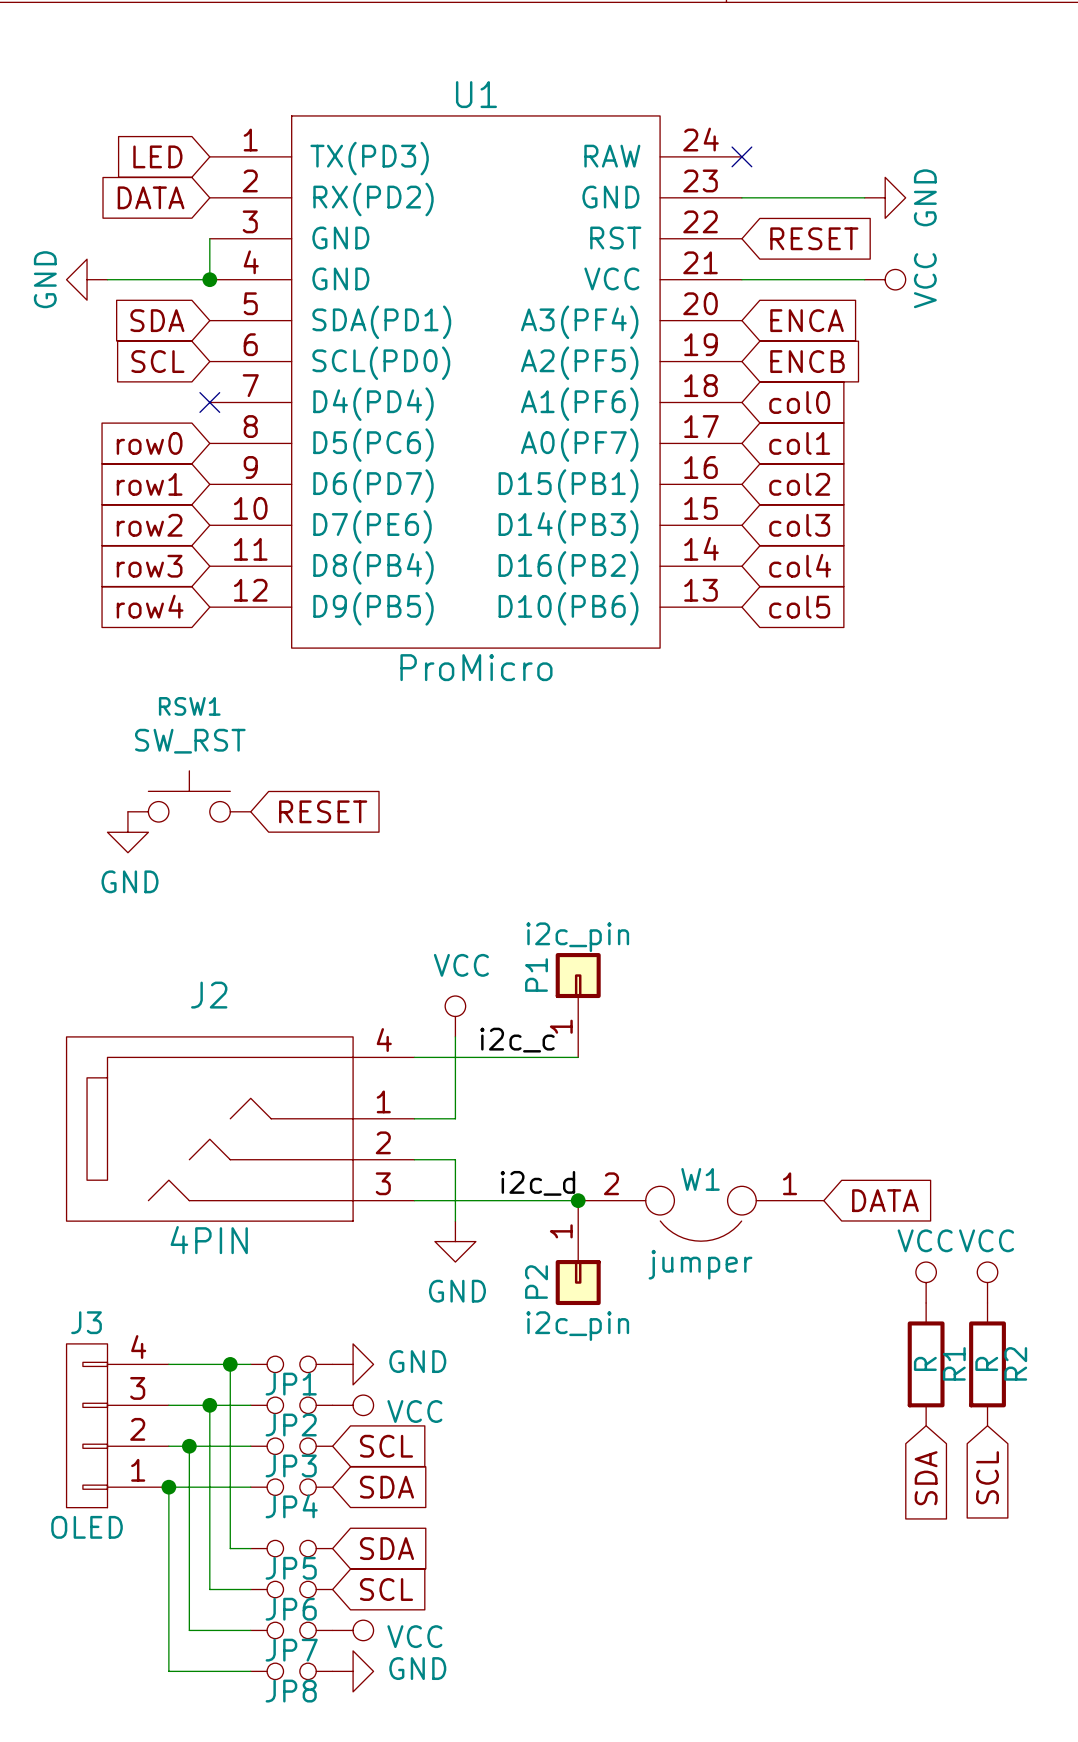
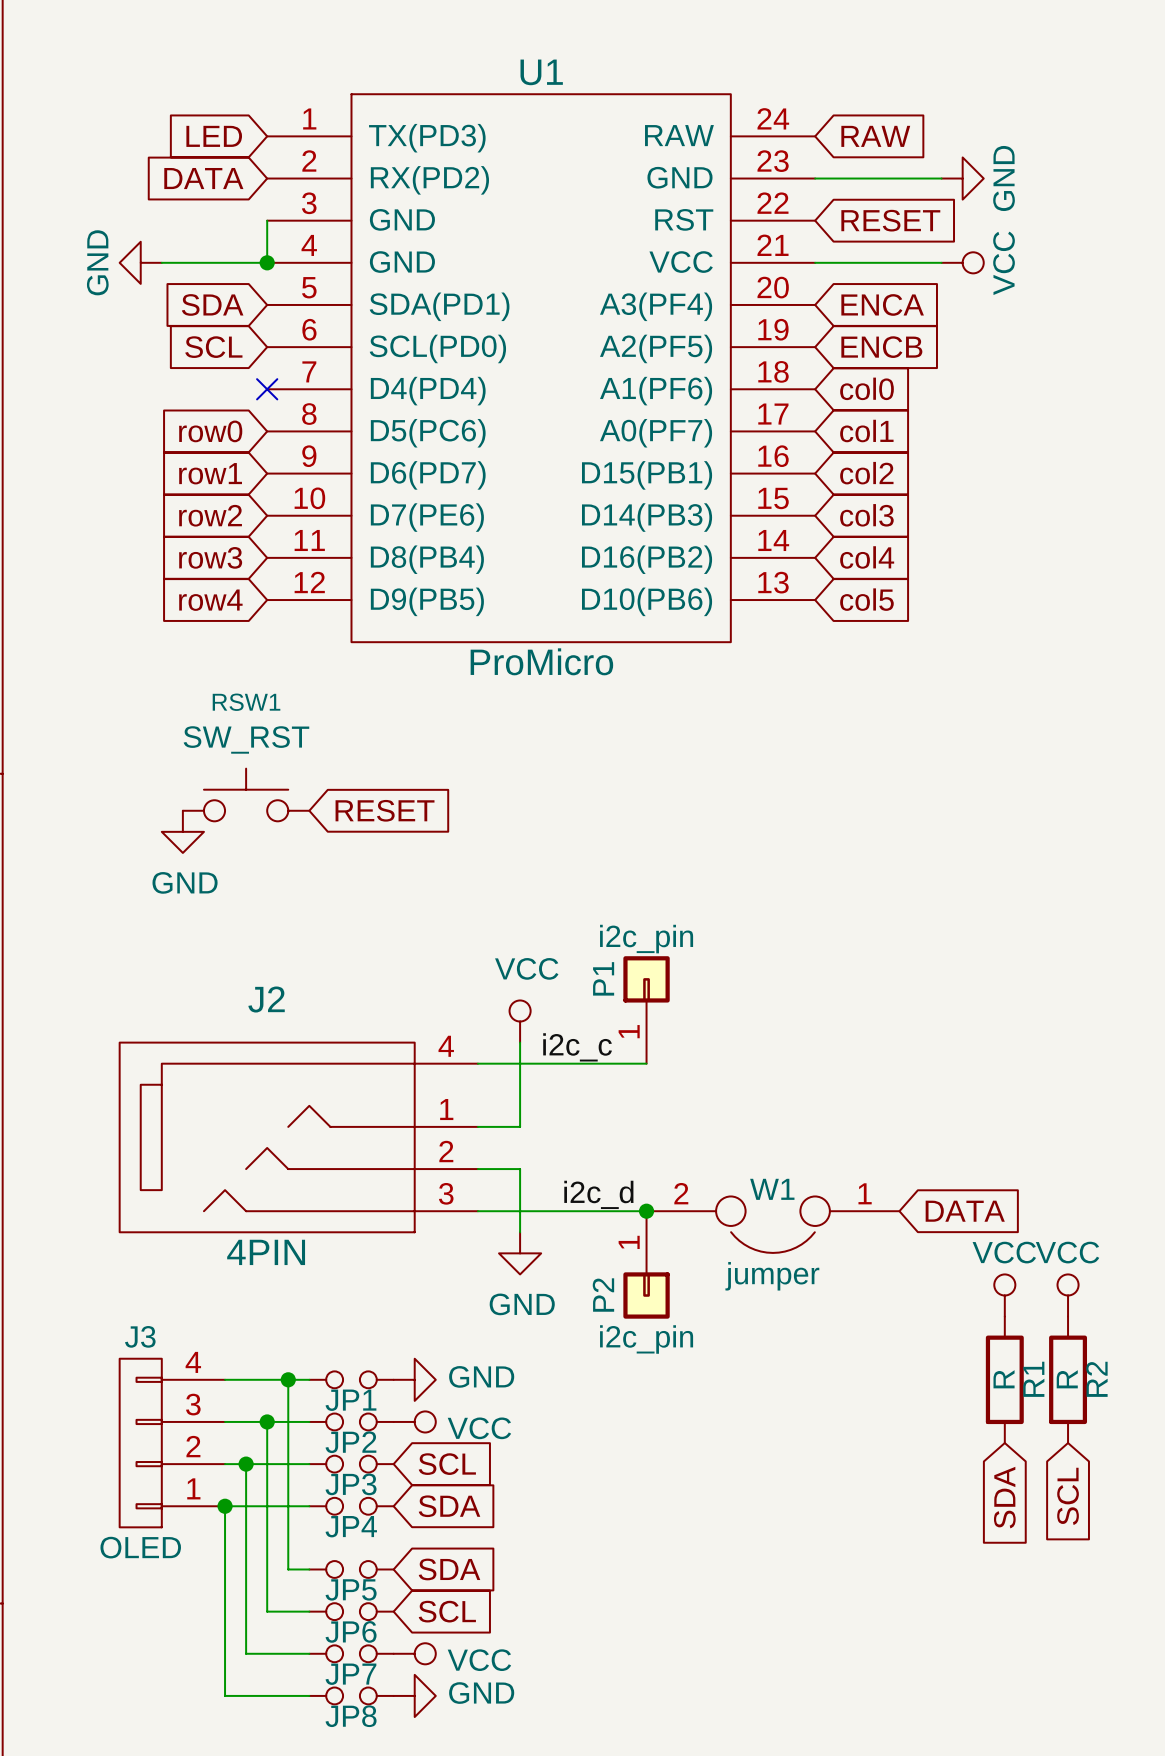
no-connect mark: (741, 156) -> none
global label: none -> RAW (875, 136)

